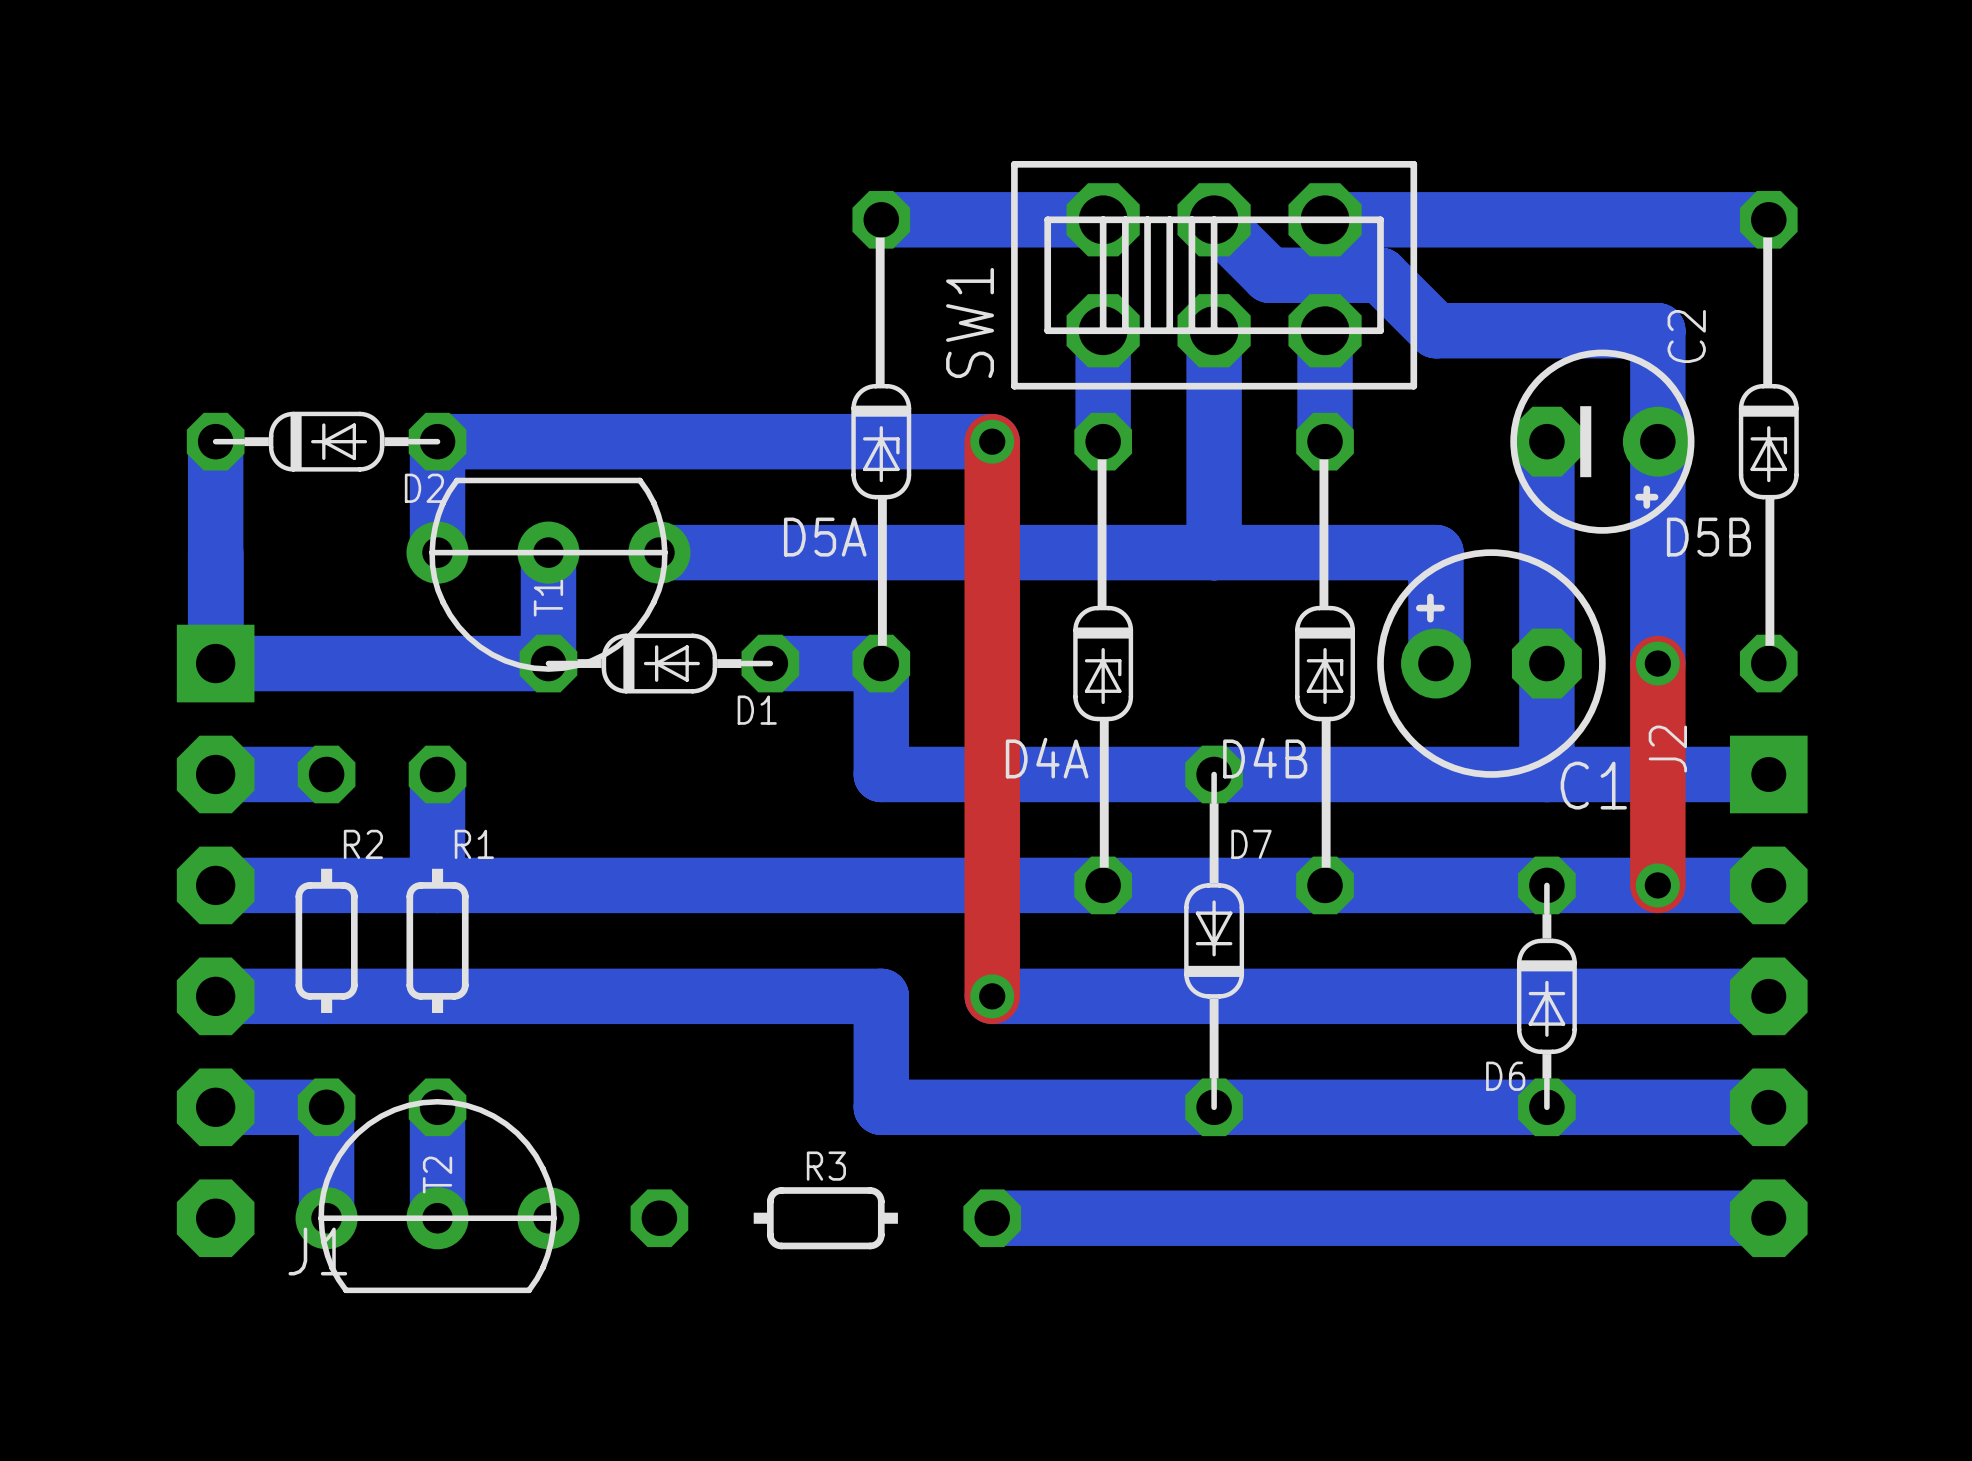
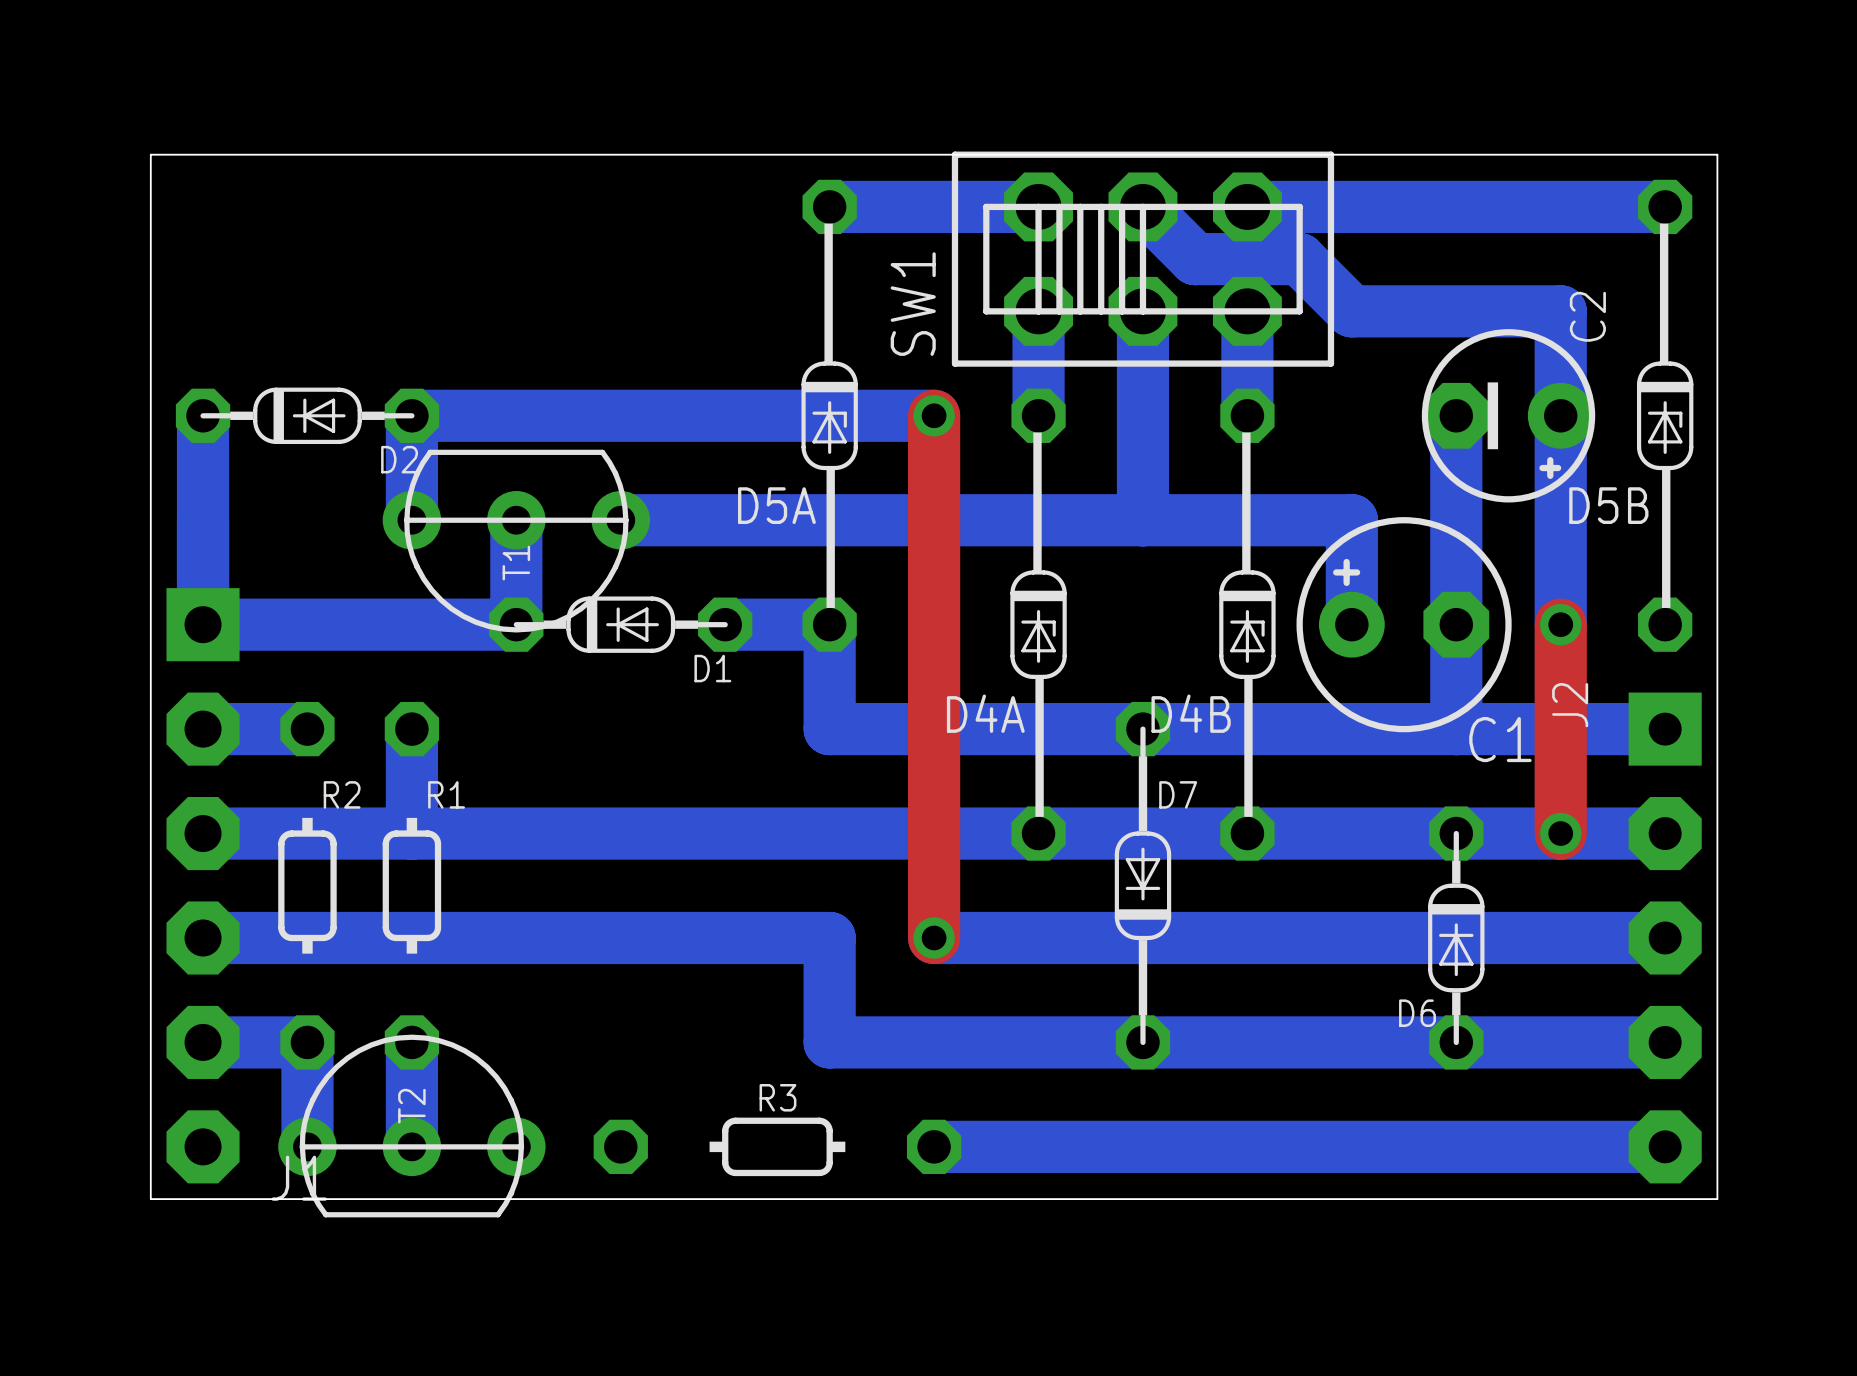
board edge: none -> (150, 154) (1717, 154) (1717, 1199) (150, 1199) (150, 154)

